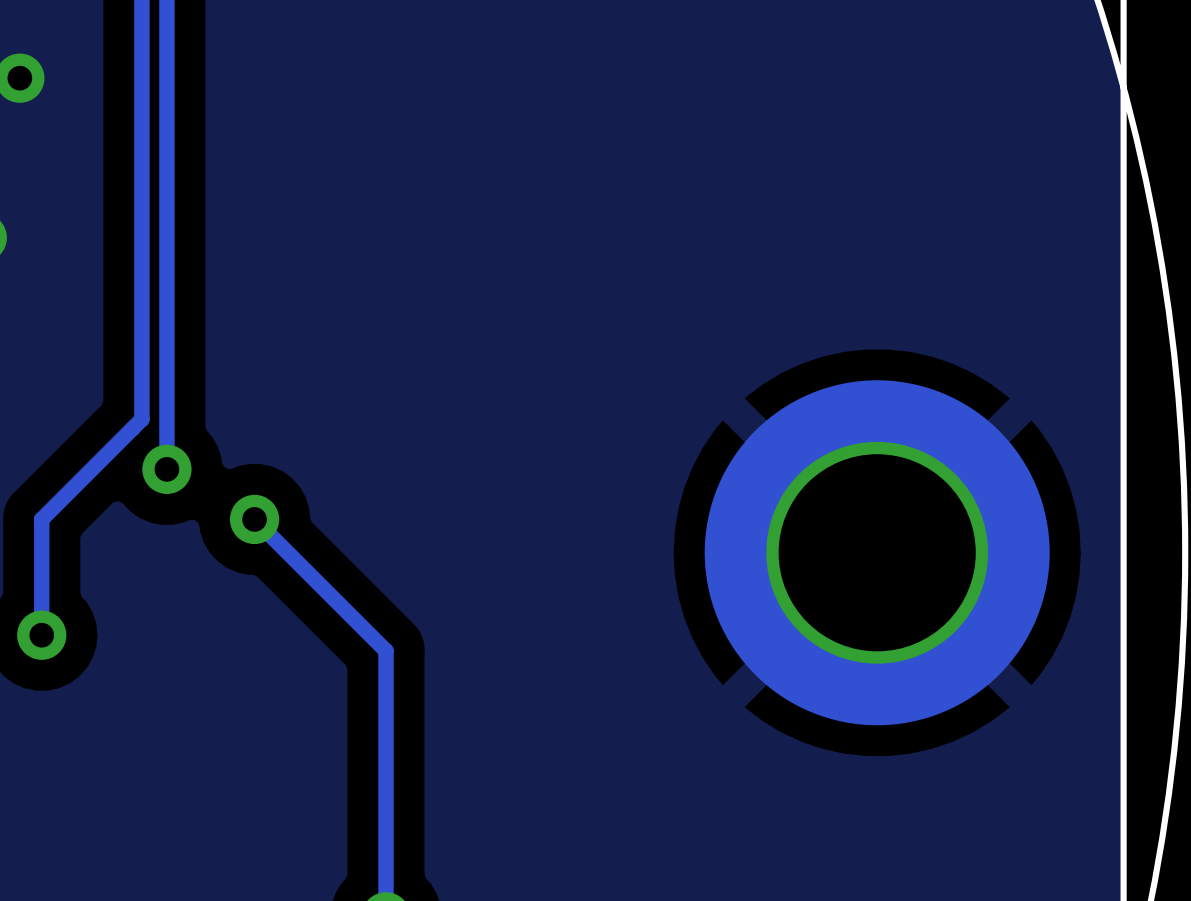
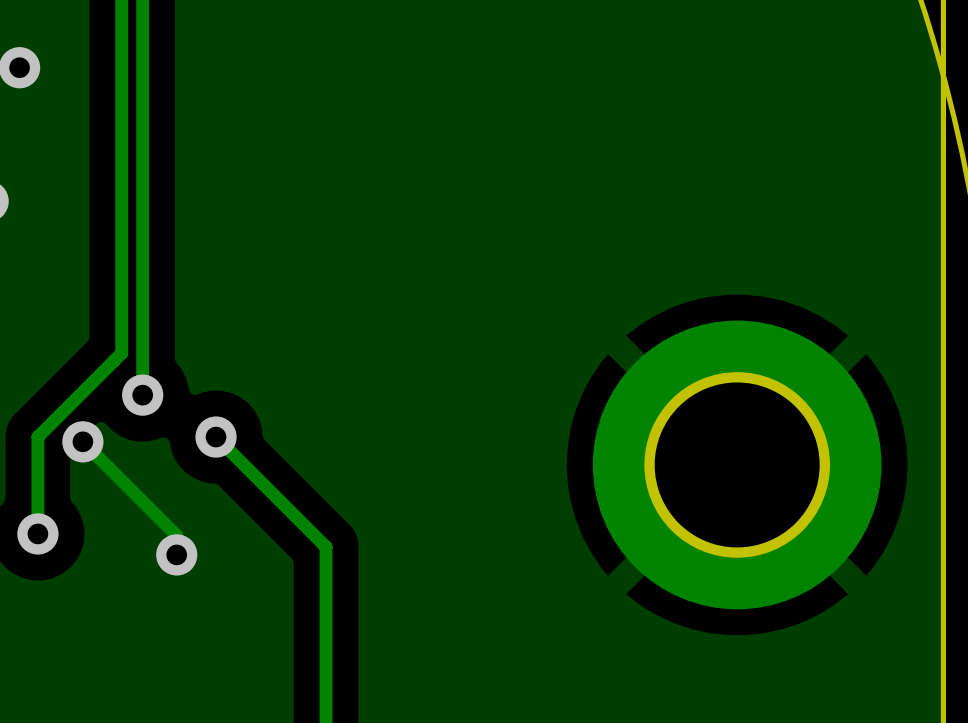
track: none -> (82, 441) (176, 535) (176, 554)
via: none -> (82, 441)
via: none -> (176, 554)

